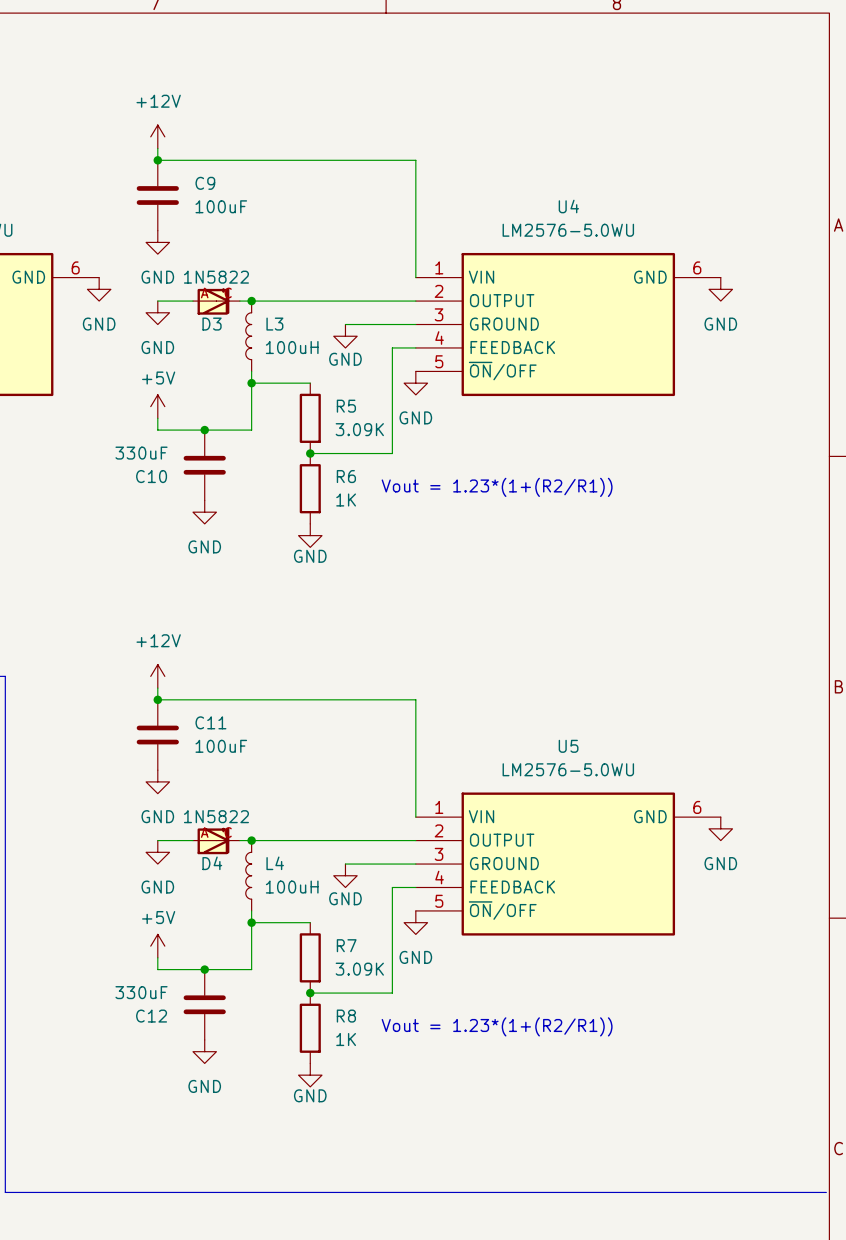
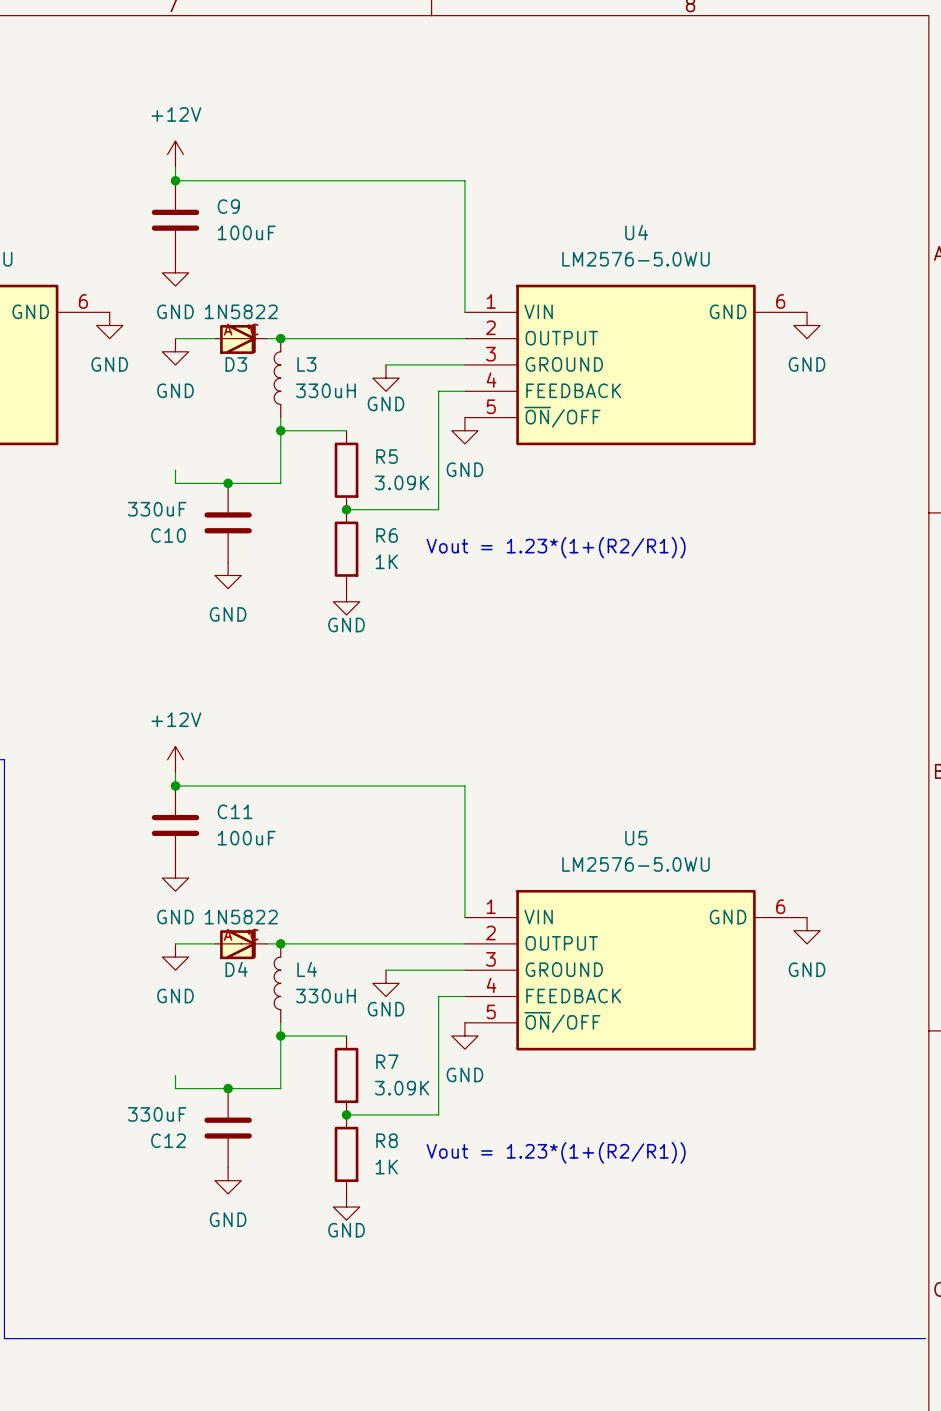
L3 value: 100uH (292, 347) -> 330uH (325, 390)
power symbol: +5V (157, 406) -> none
L4 value: 100uH (292, 887) -> 330uH (325, 996)
power symbol: +5V (157, 946) -> none

